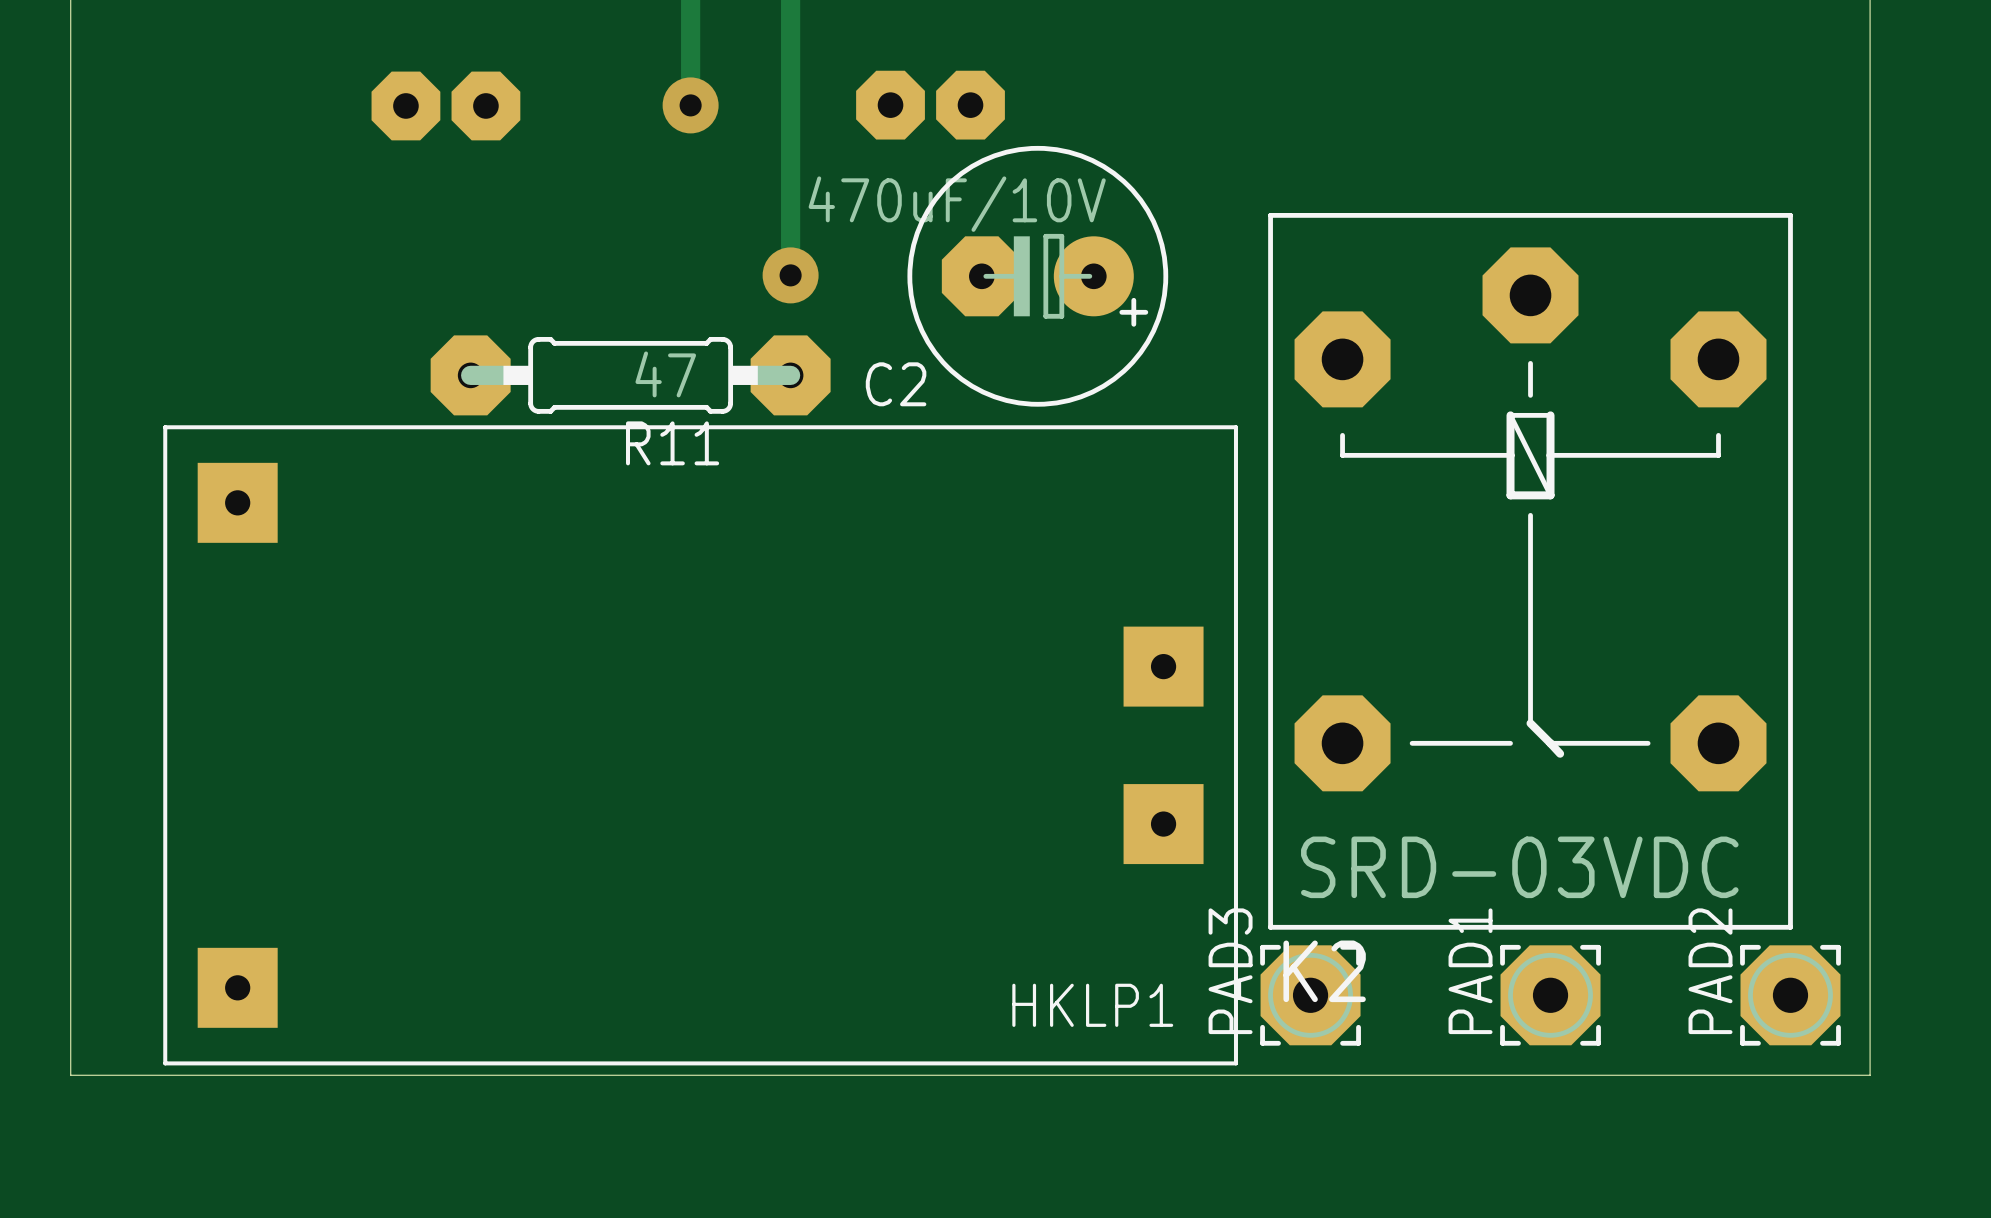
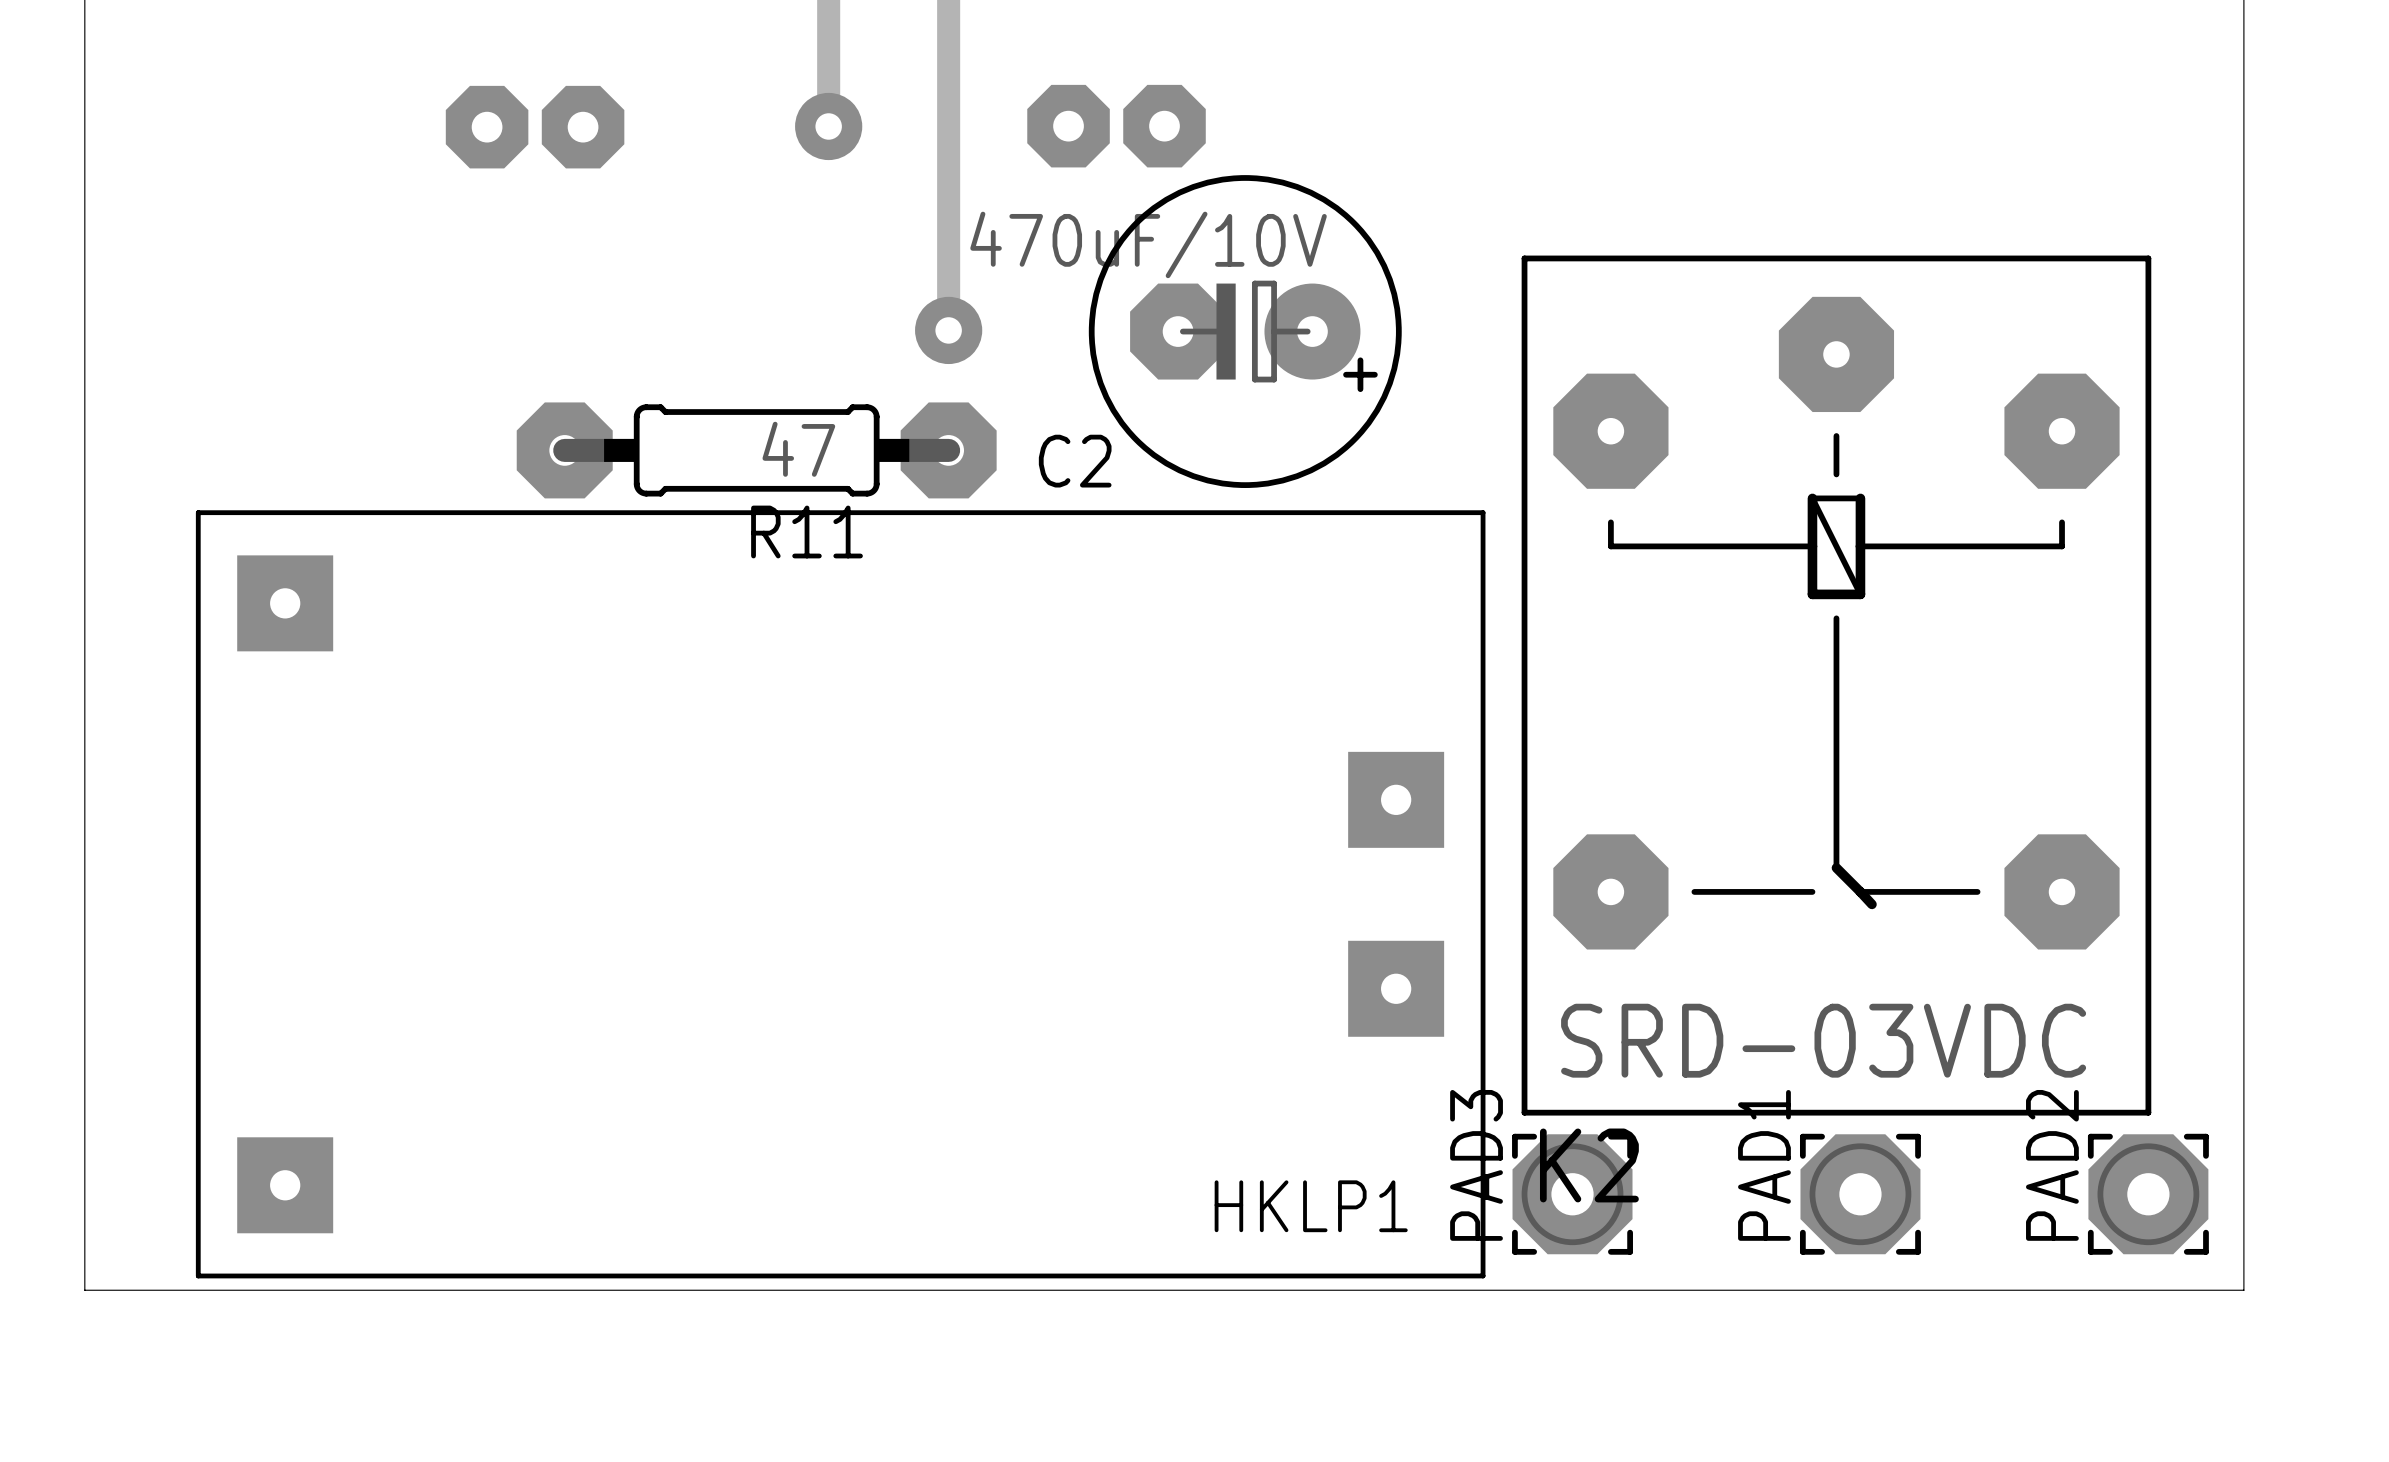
K2 footprint: [1268, 213, 1793, 930] -> [1521, 255, 2152, 1116]

